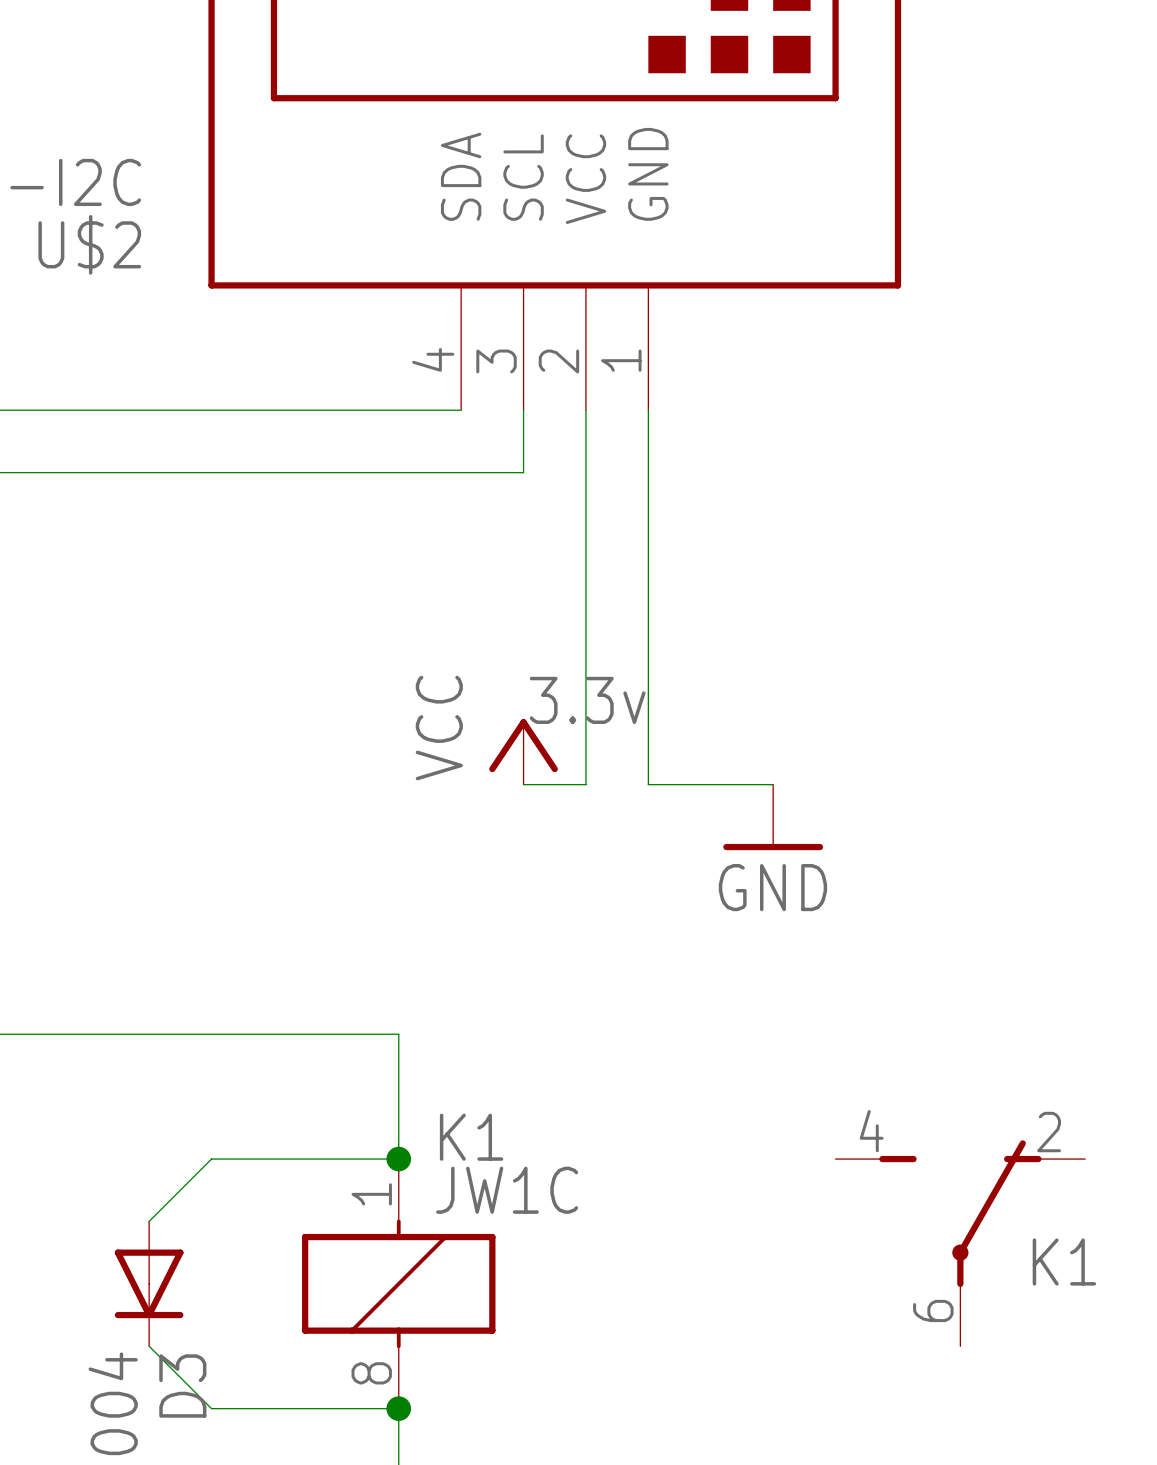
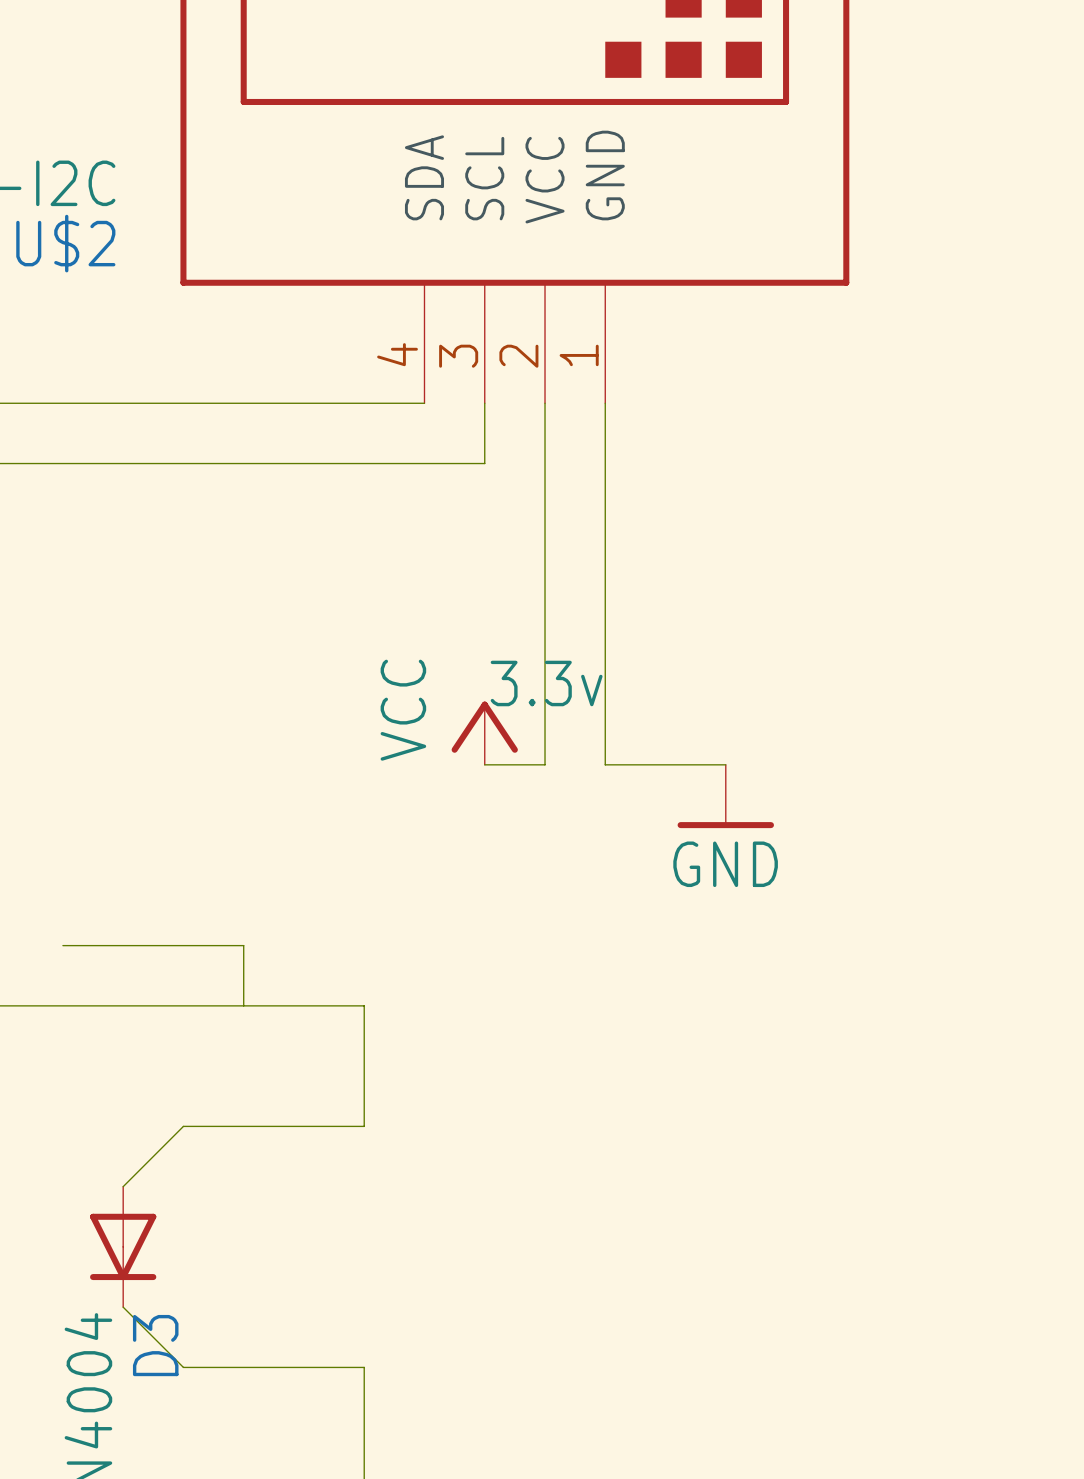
wire: none -> (62, 945) (243, 945) (243, 1005)
junction: (398, 1159) -> none
K1: (960, 1243) -> none
K1: JW1C (398, 1283) -> none
junction: (398, 1408) -> none

